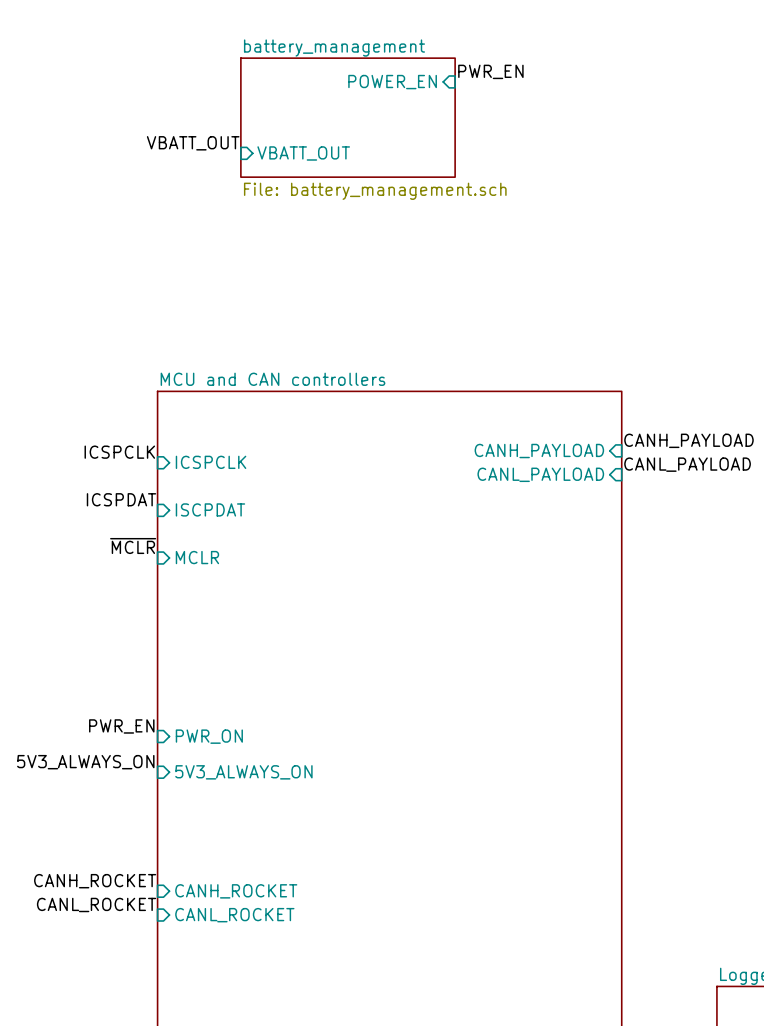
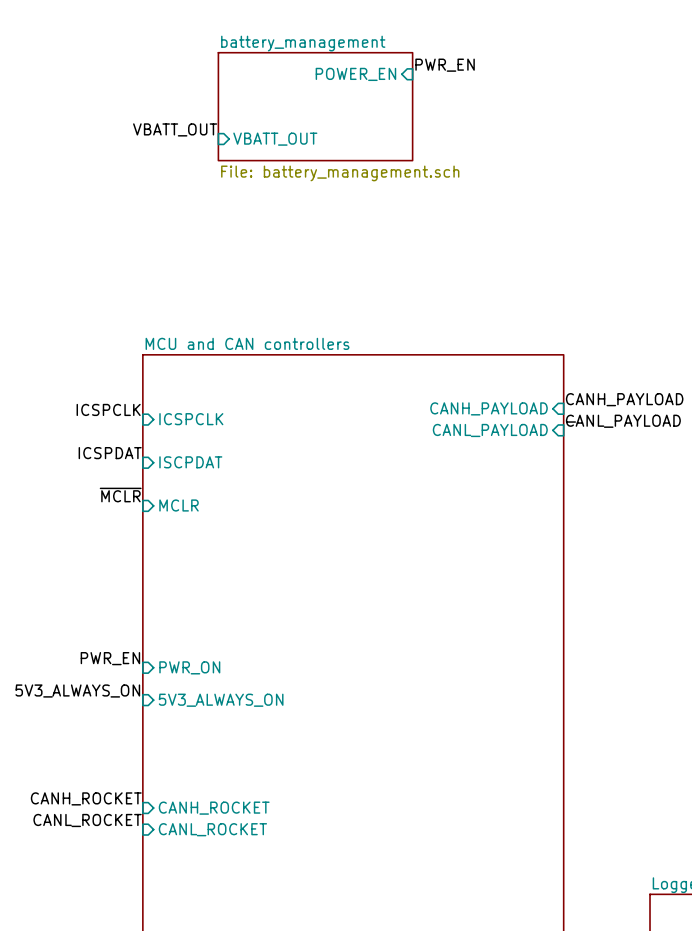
label: none -> - (571, 422)

